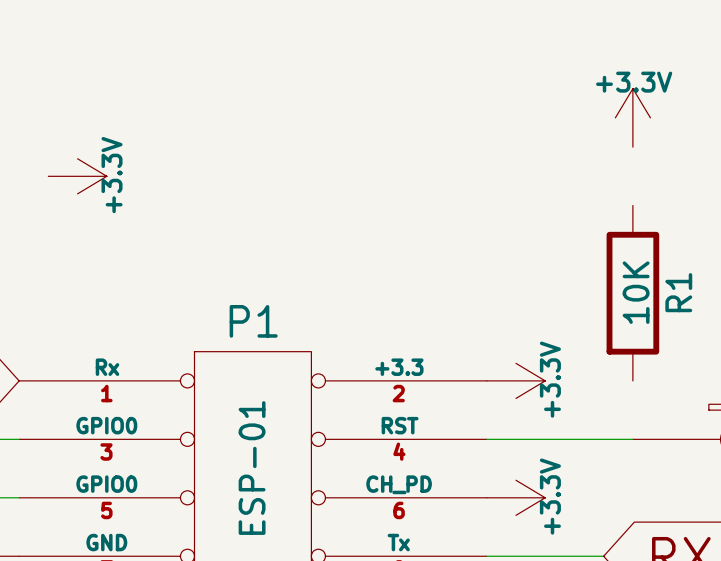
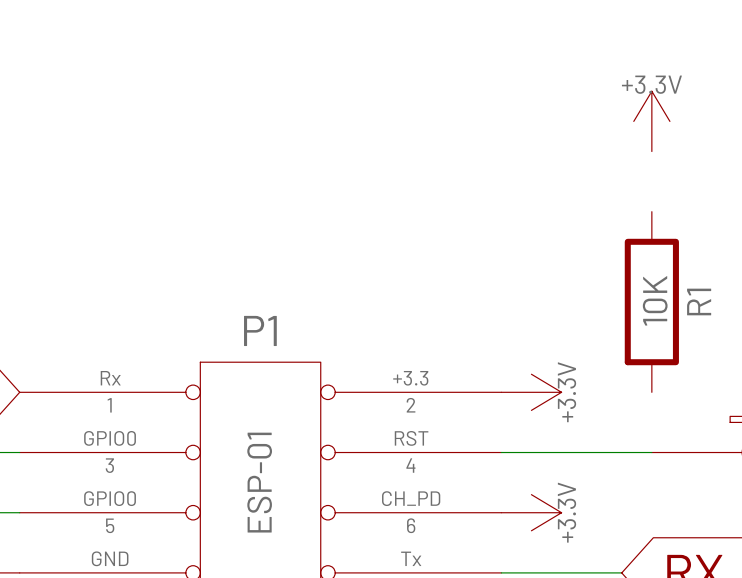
power symbol: +3.3V (77, 176) -> none

